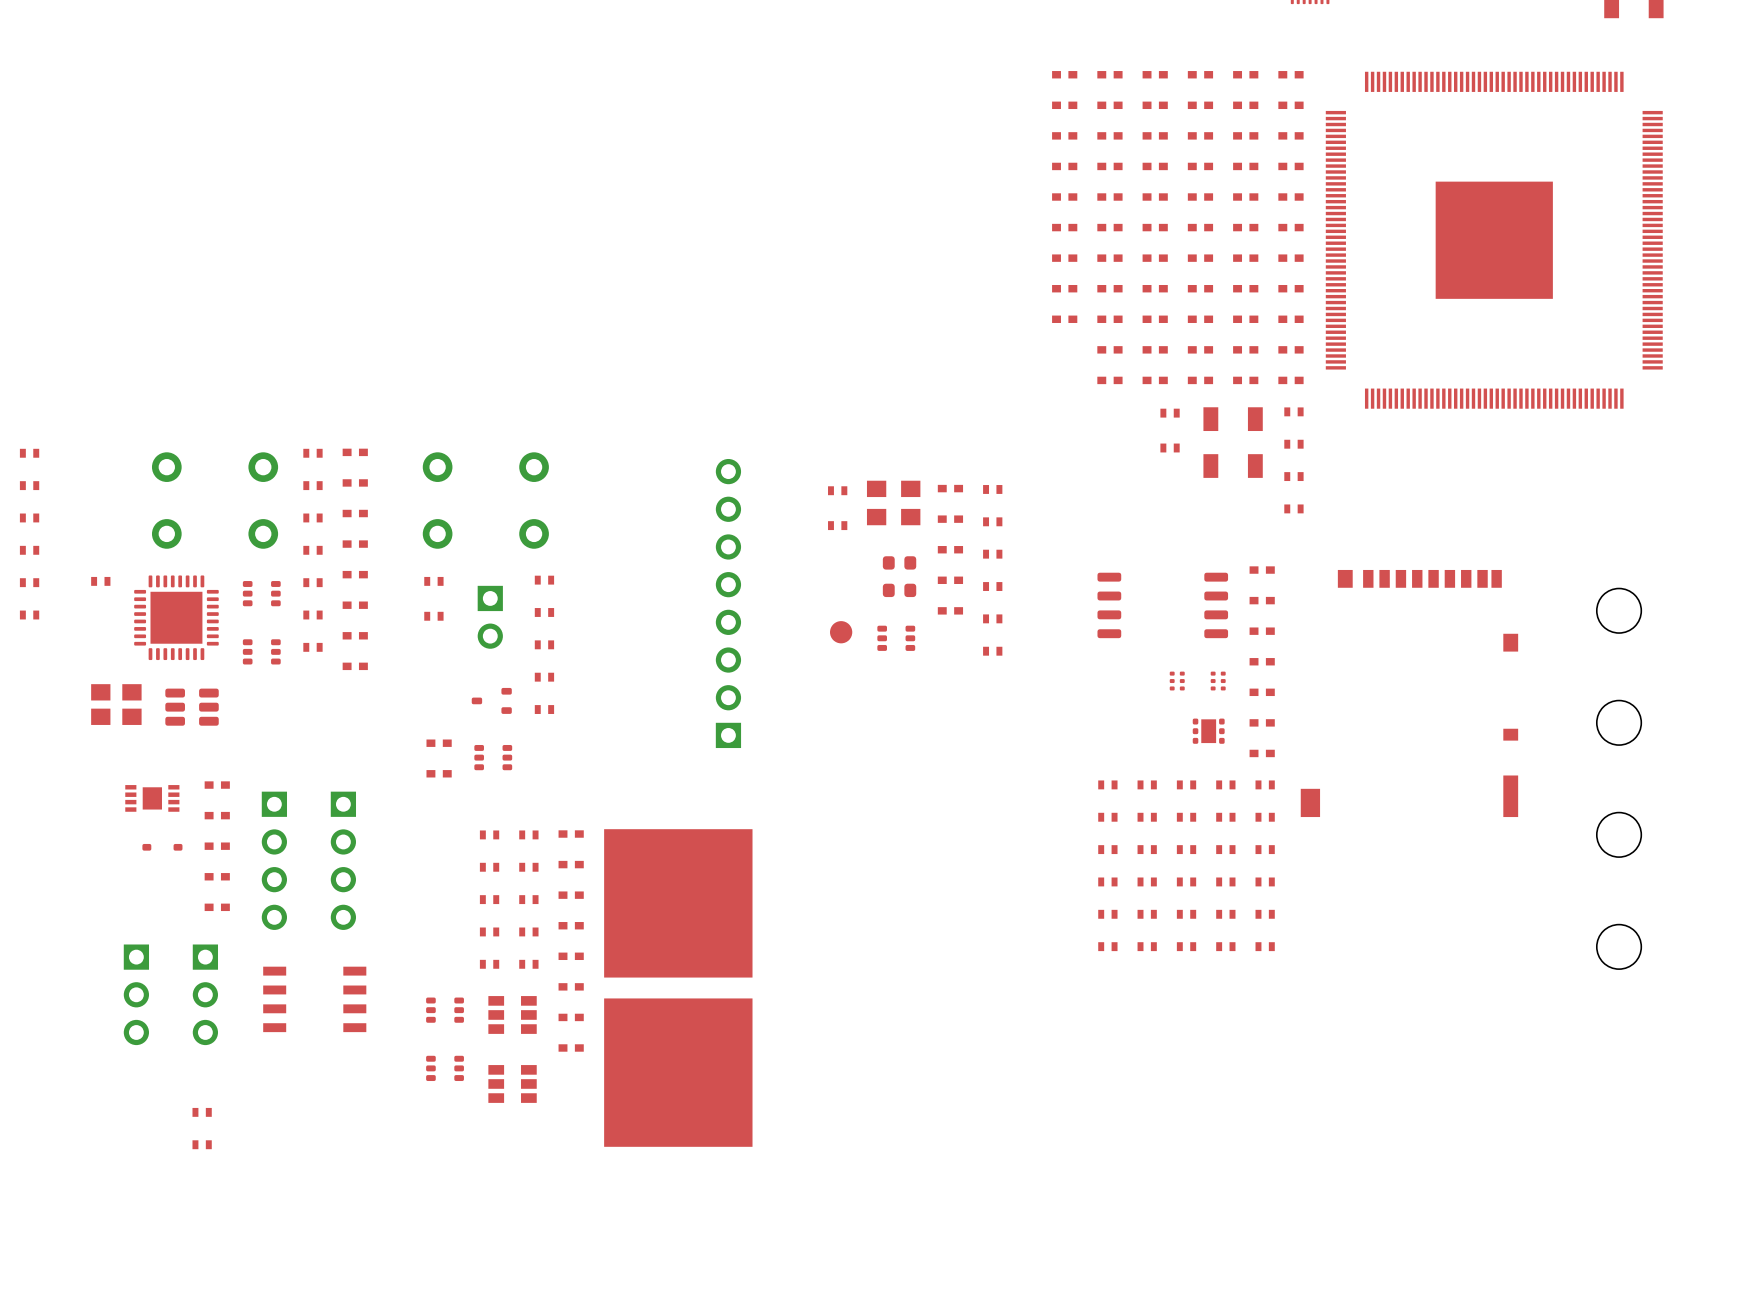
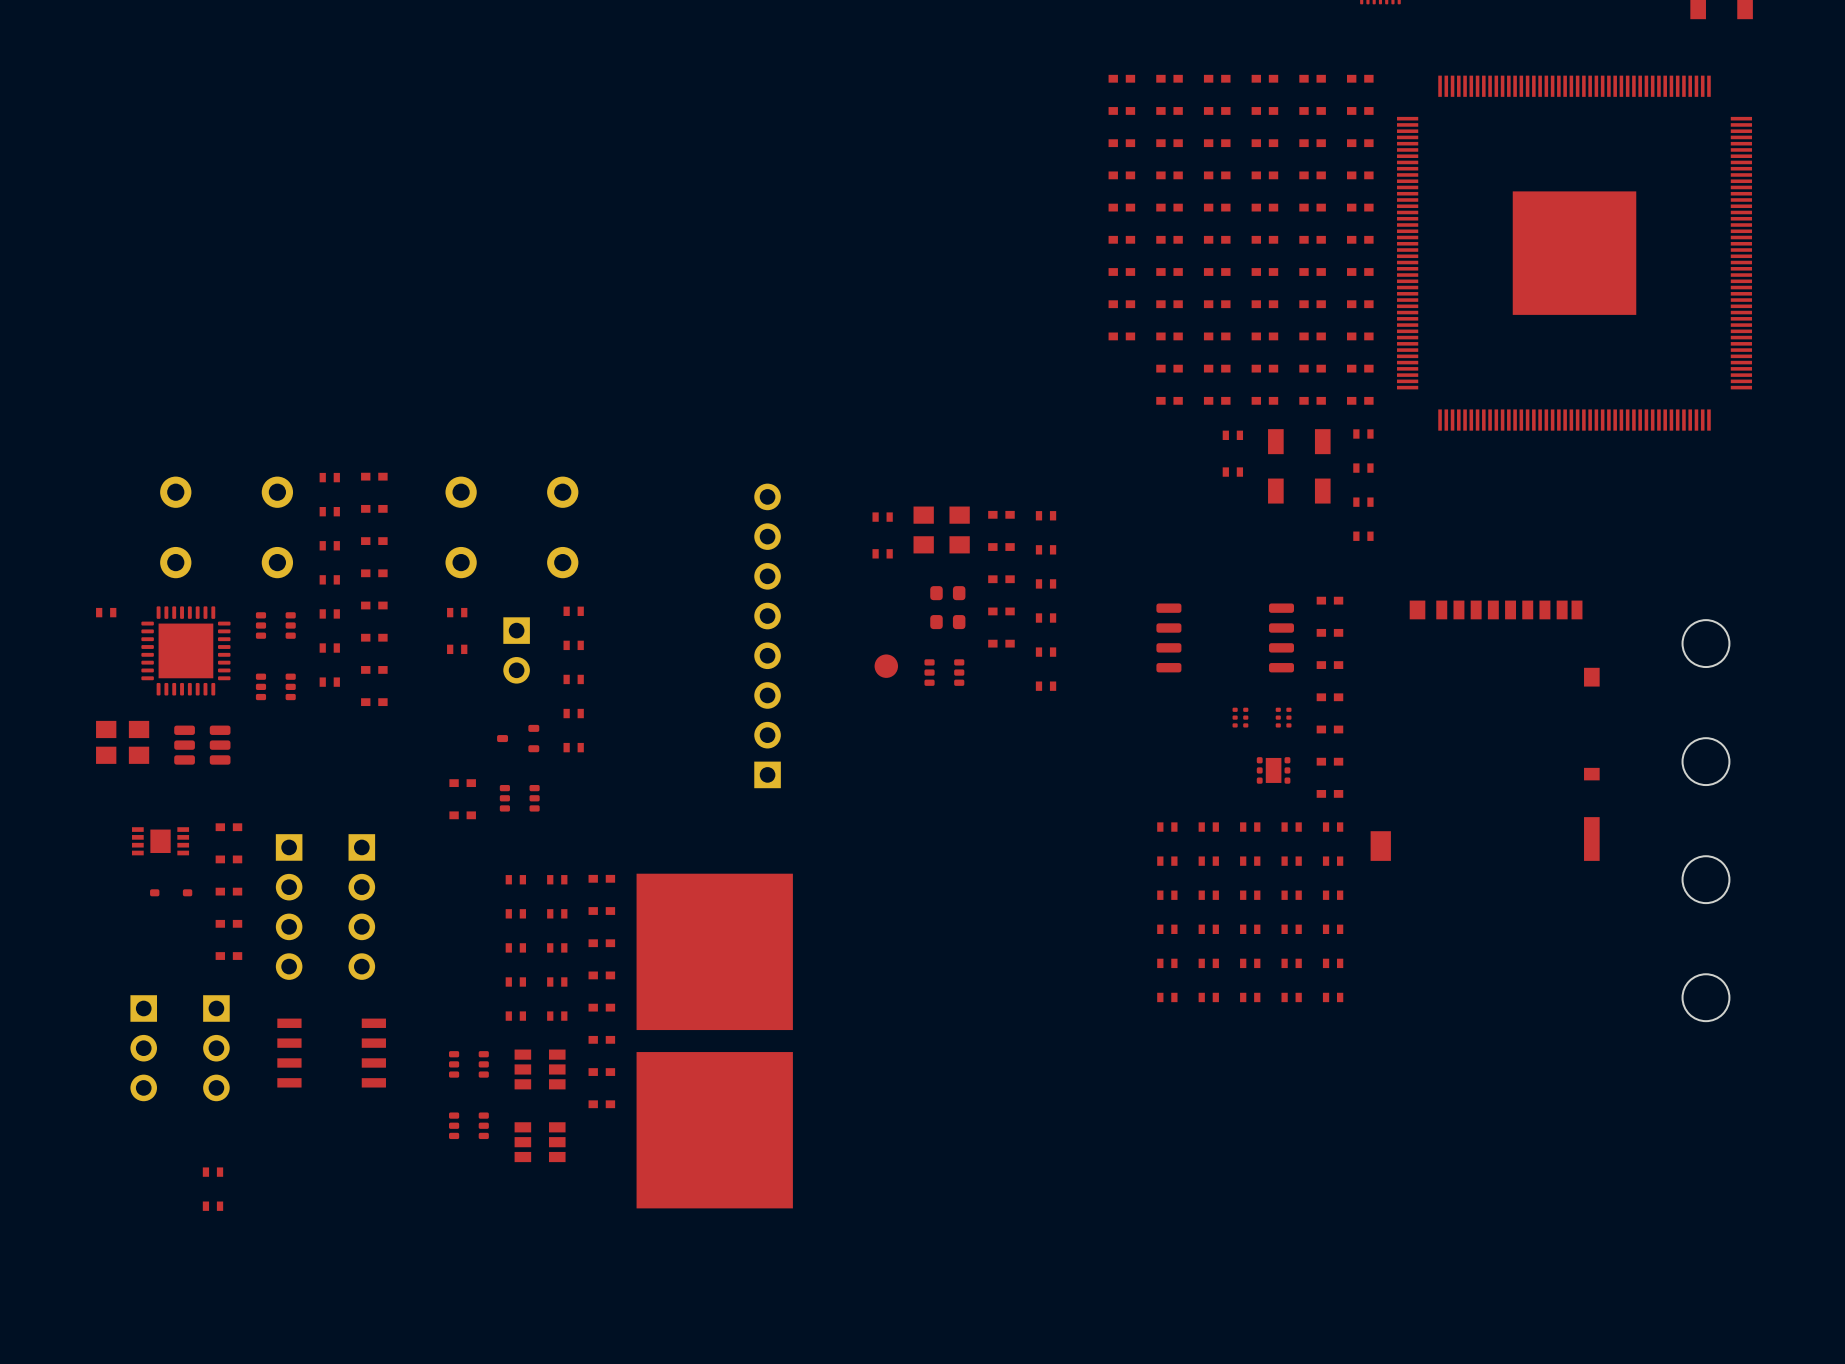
part: (29, 453) -> none
part: (29, 485) -> none
part: (29, 517) -> none
part: (29, 550) -> none
part: (29, 582) -> none
part: (29, 615) -> none

